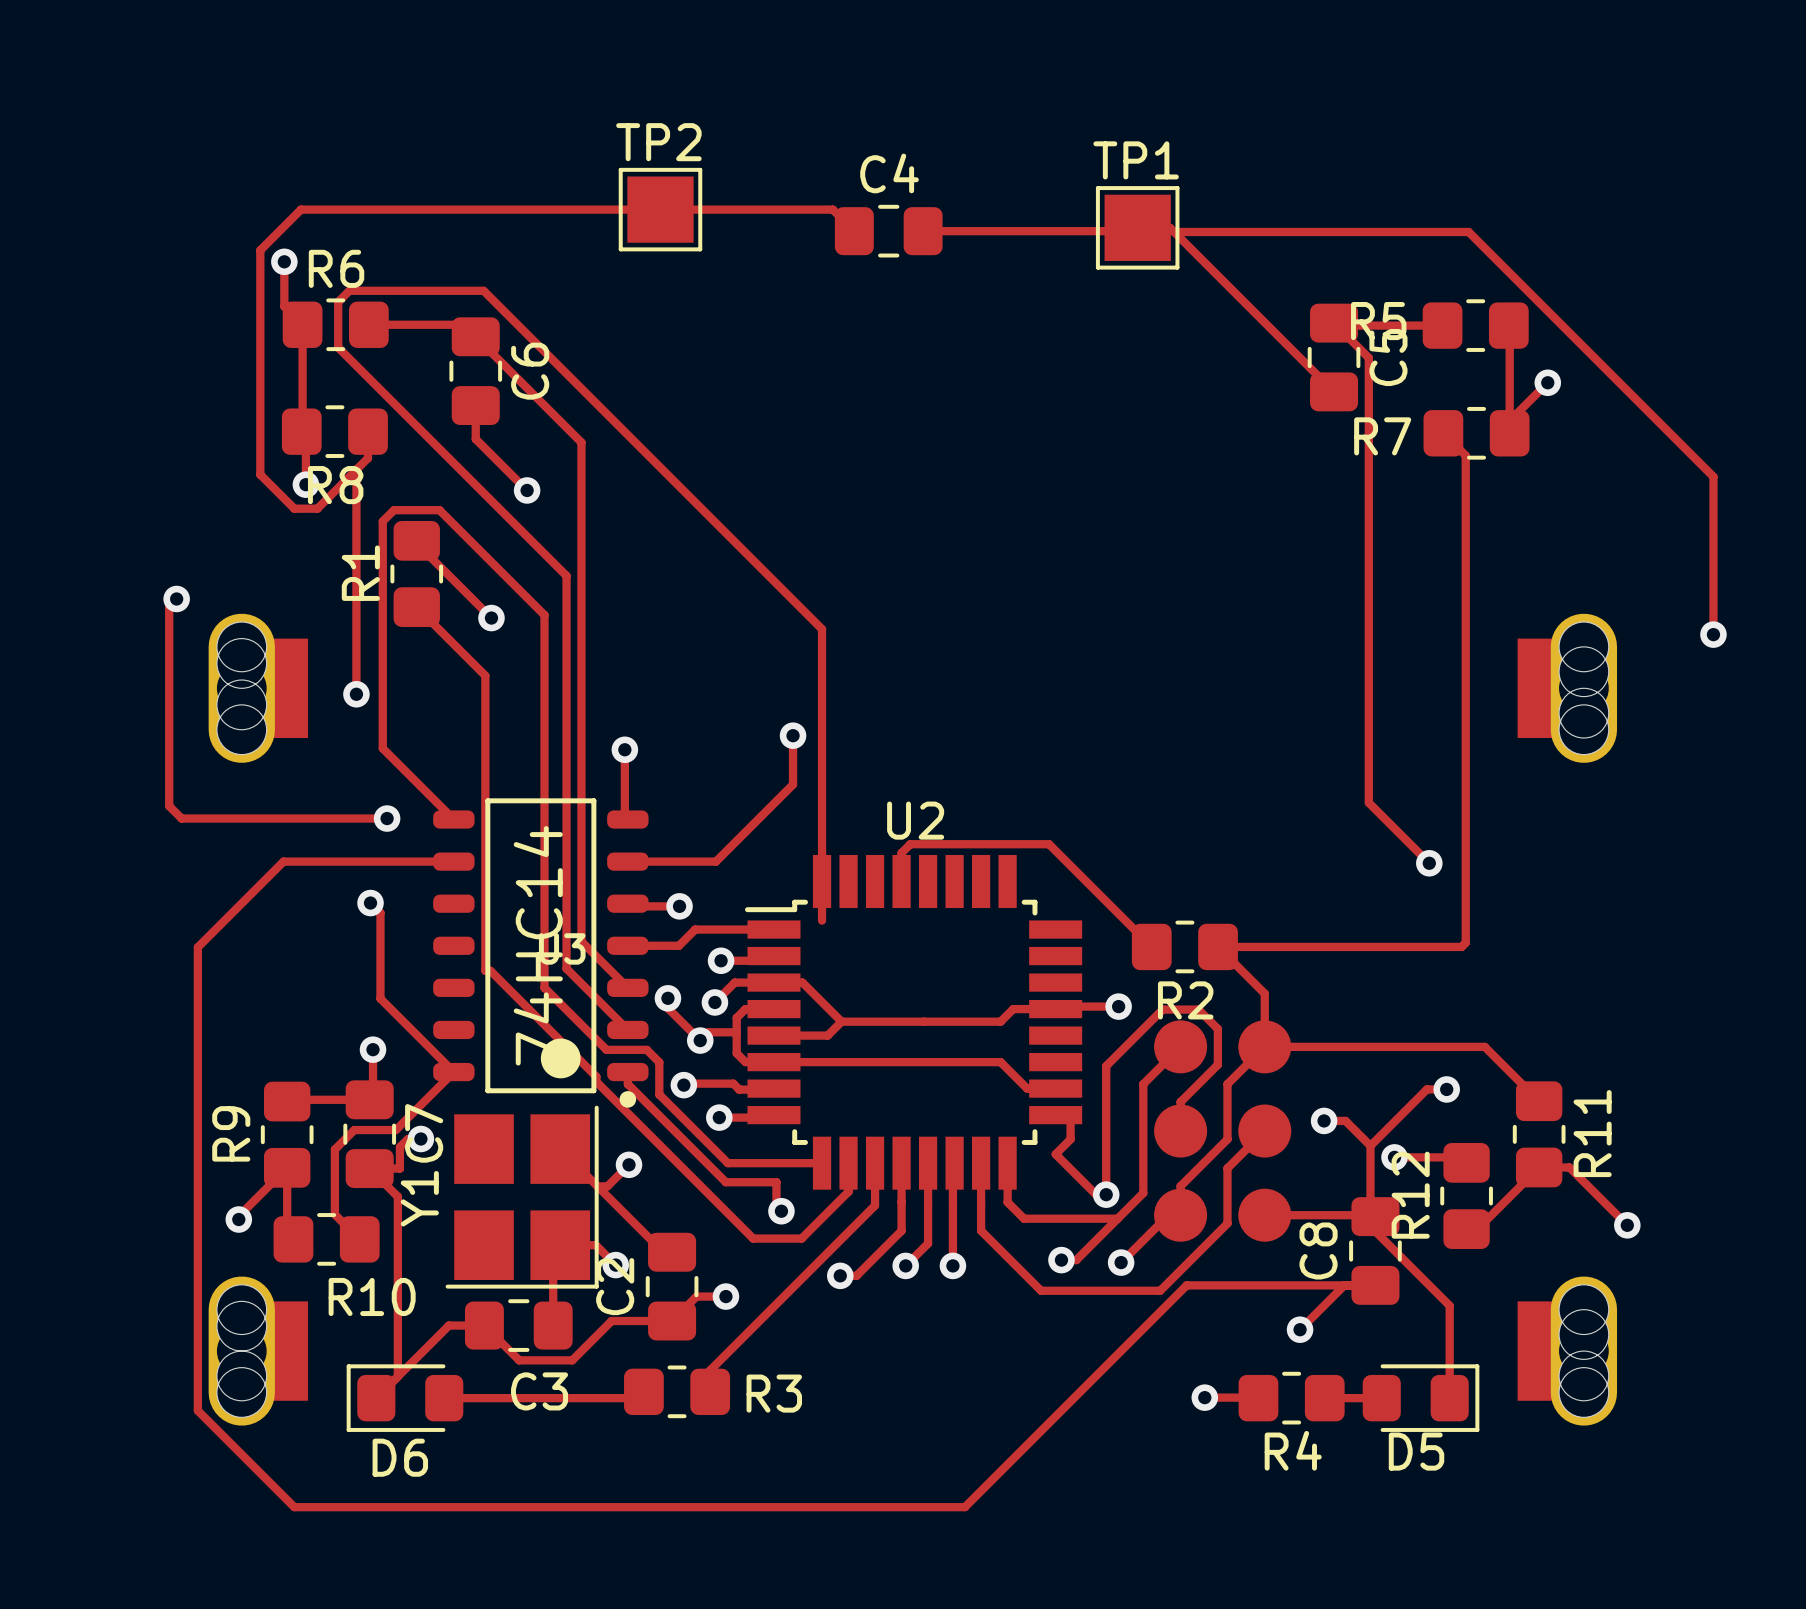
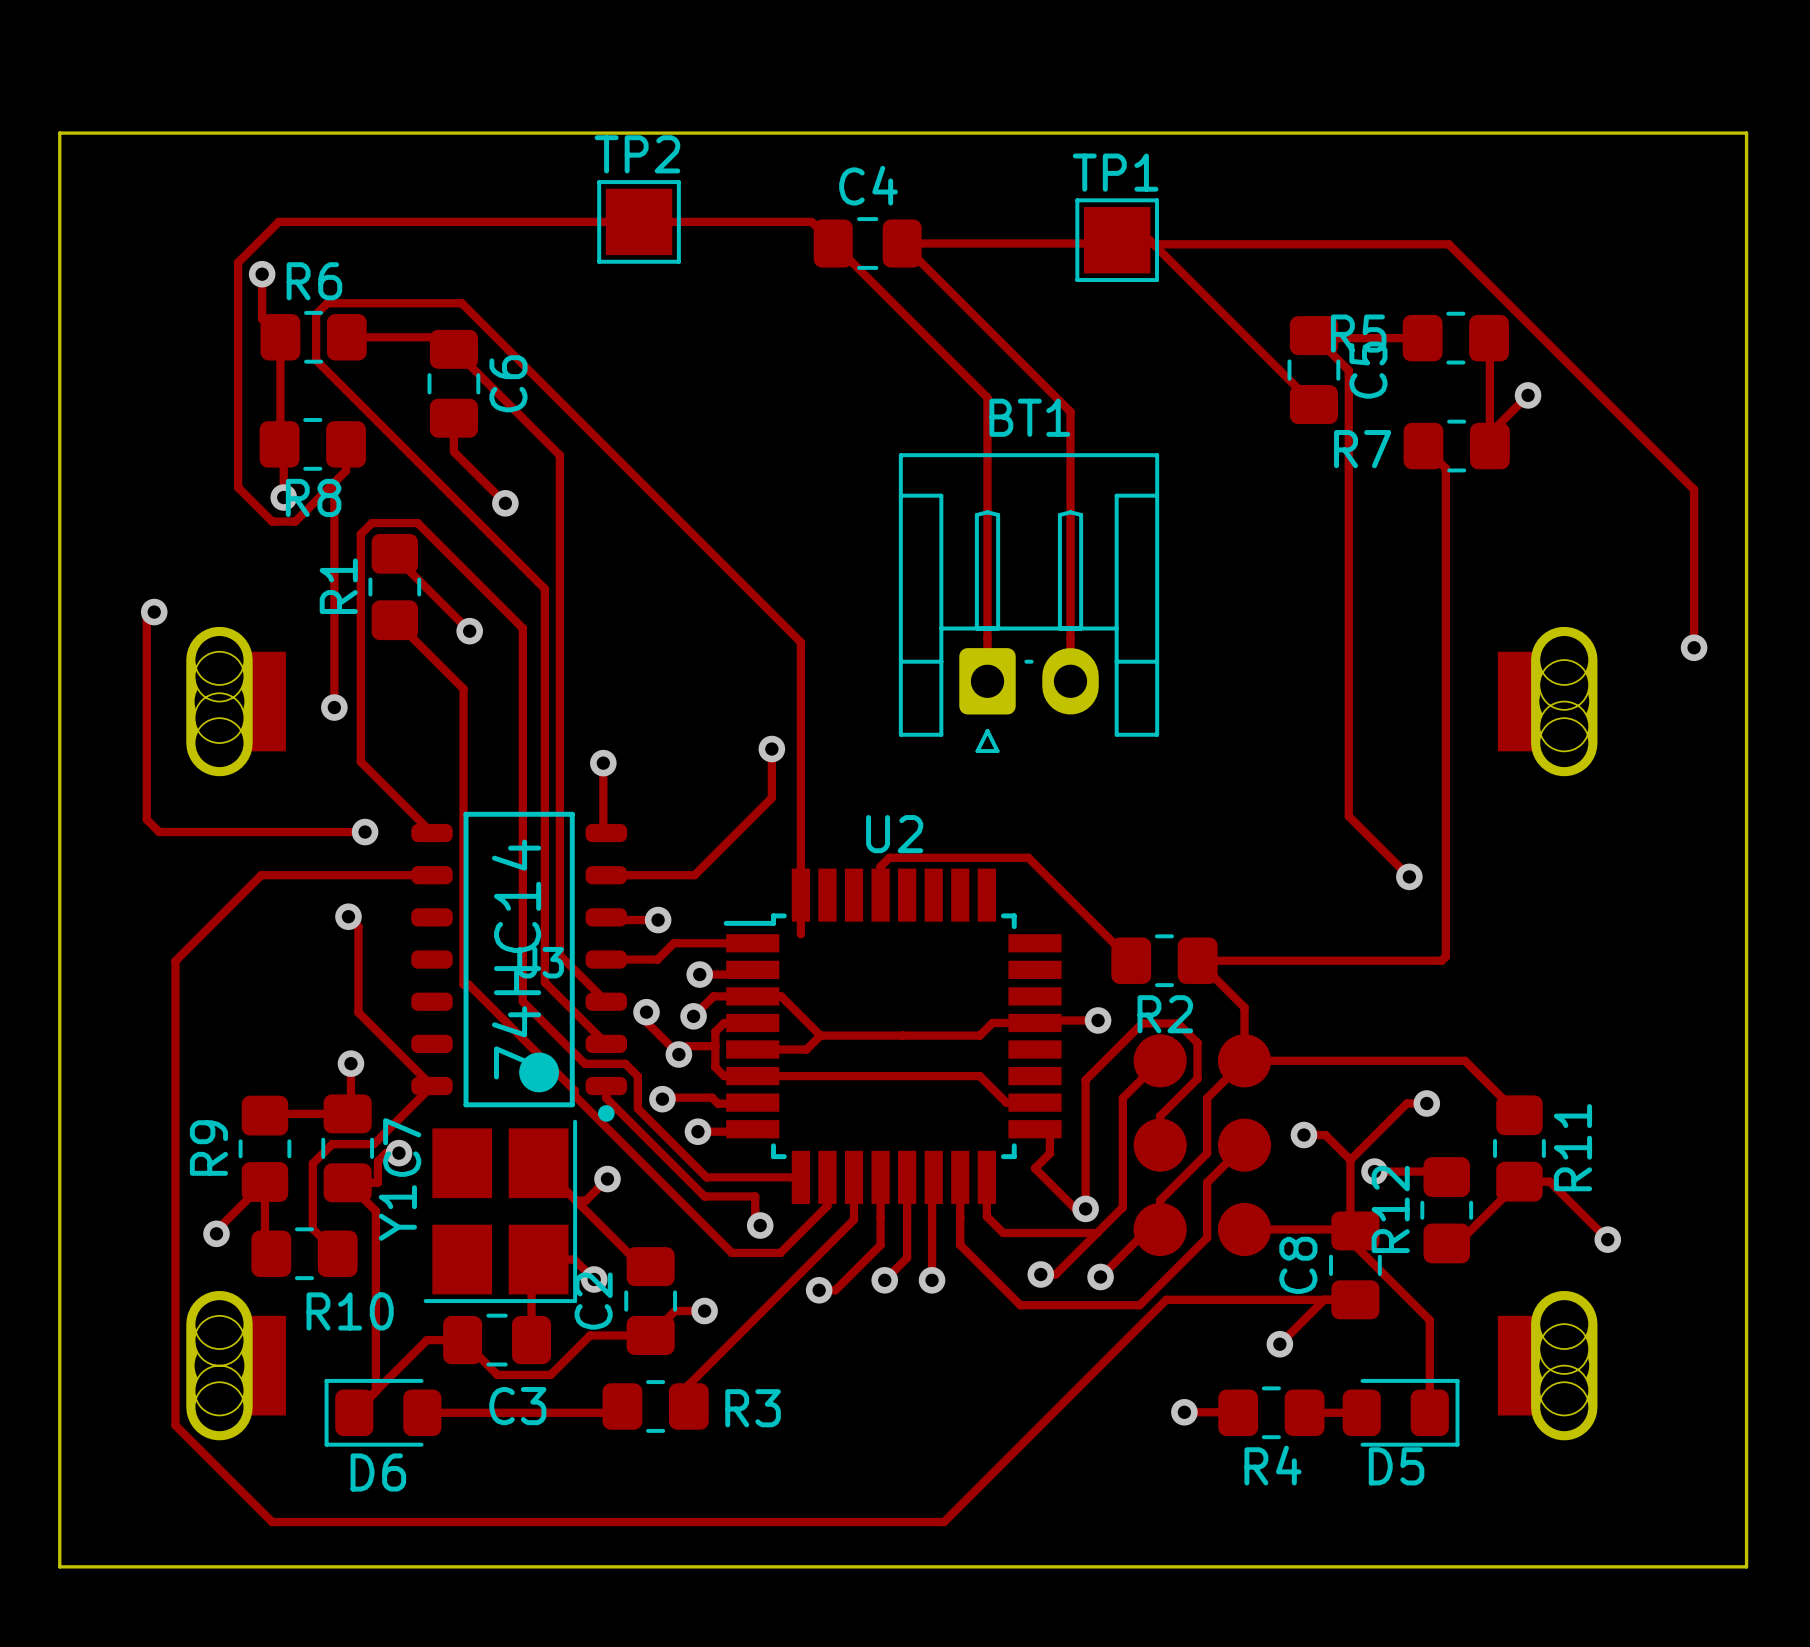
board edge: none -> (59, 133) (1746, 133) (1746, 1566) (59, 1566) (59, 133)
track: none -> (833, 243) (987, 397) (987, 681)
track: none -> (902, 243) (1070, 411) (1070, 681)
BT1: none -> (1029, 603)

